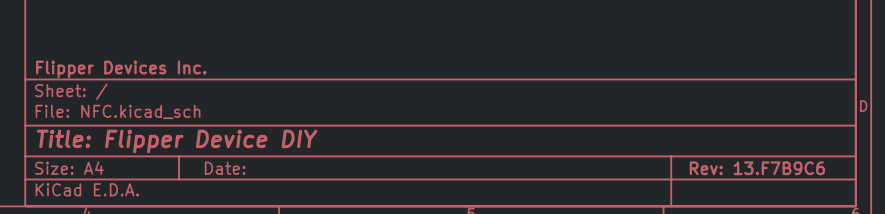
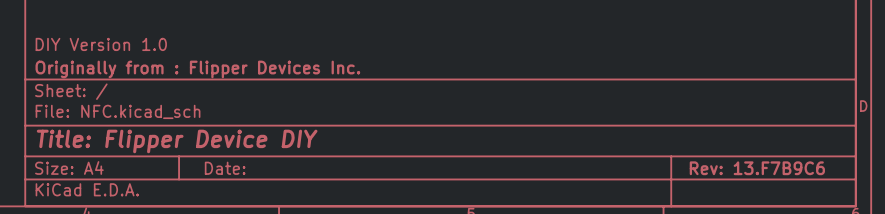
title block: none -> DIY Version 1.0 (101, 44)
title block: Flipper Devices Inc. (121, 69) -> Originally from : Flipper Devices Inc. (197, 69)

